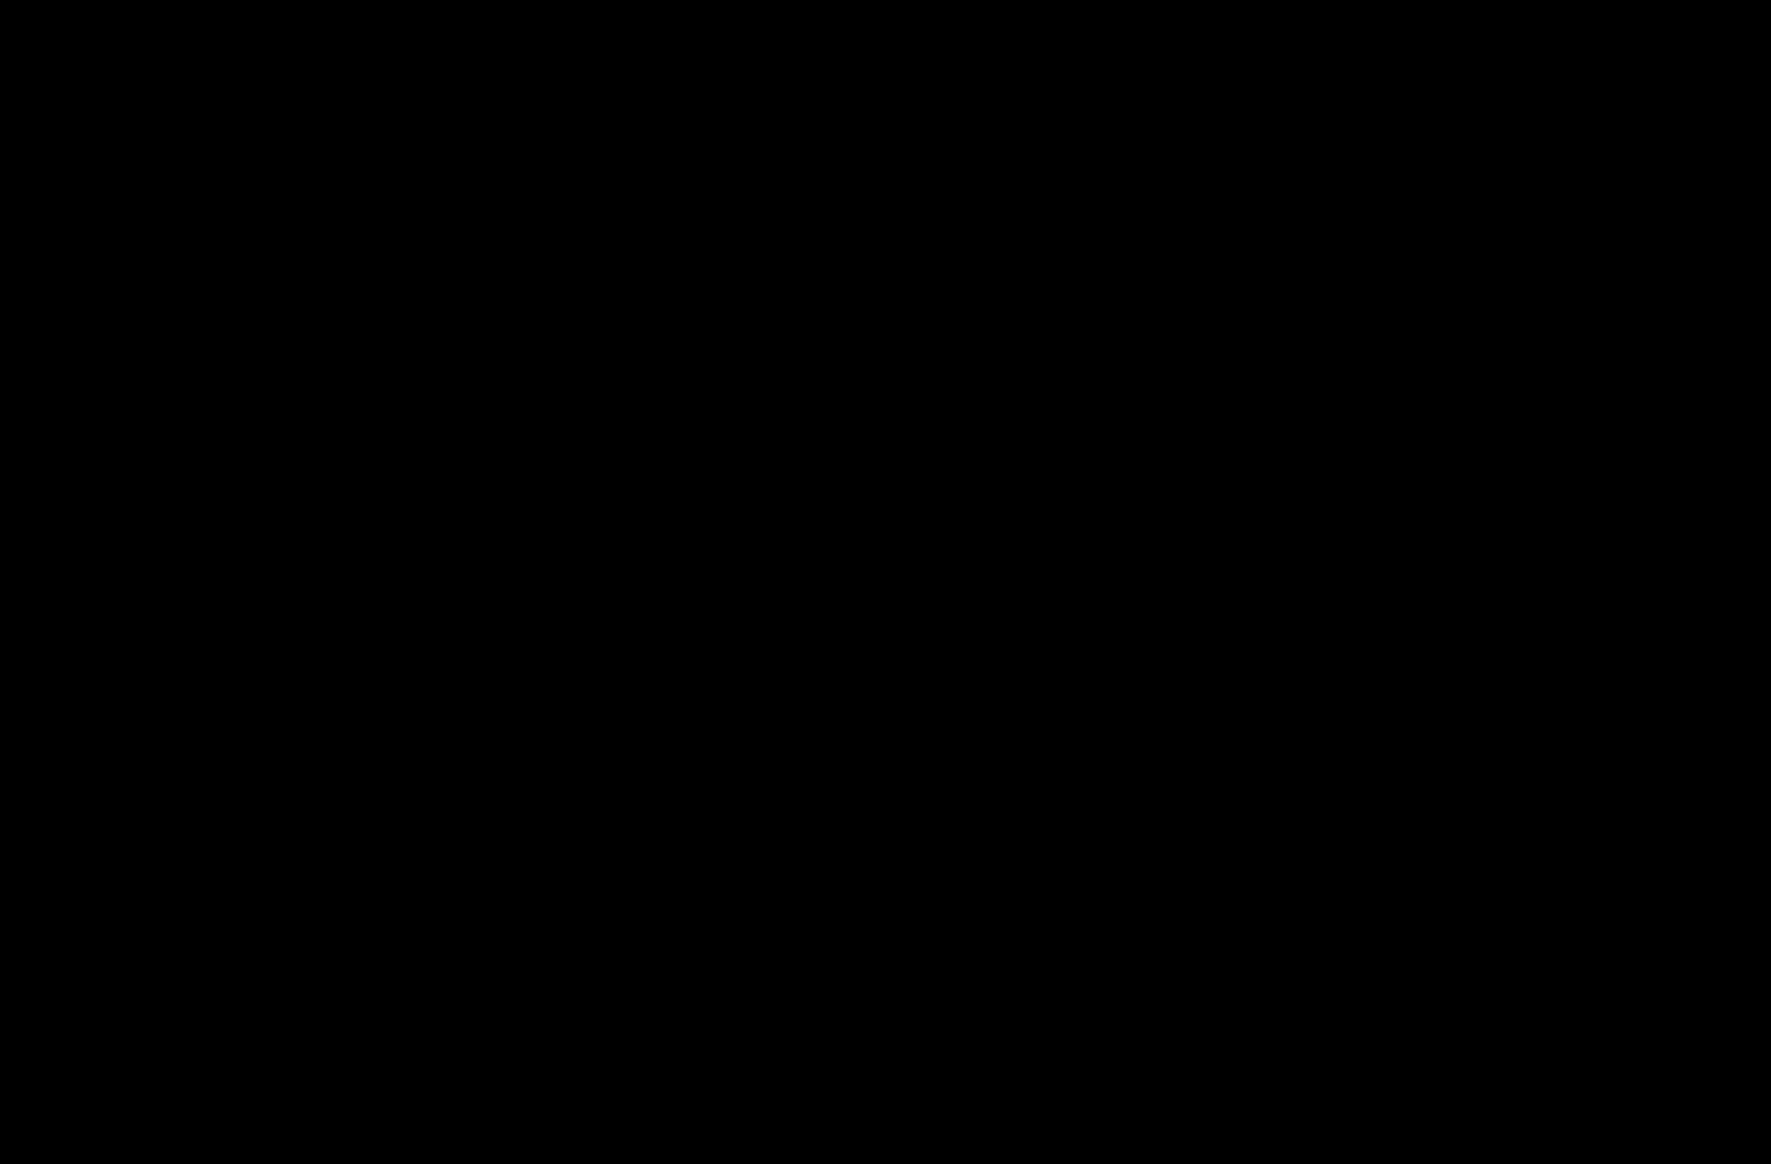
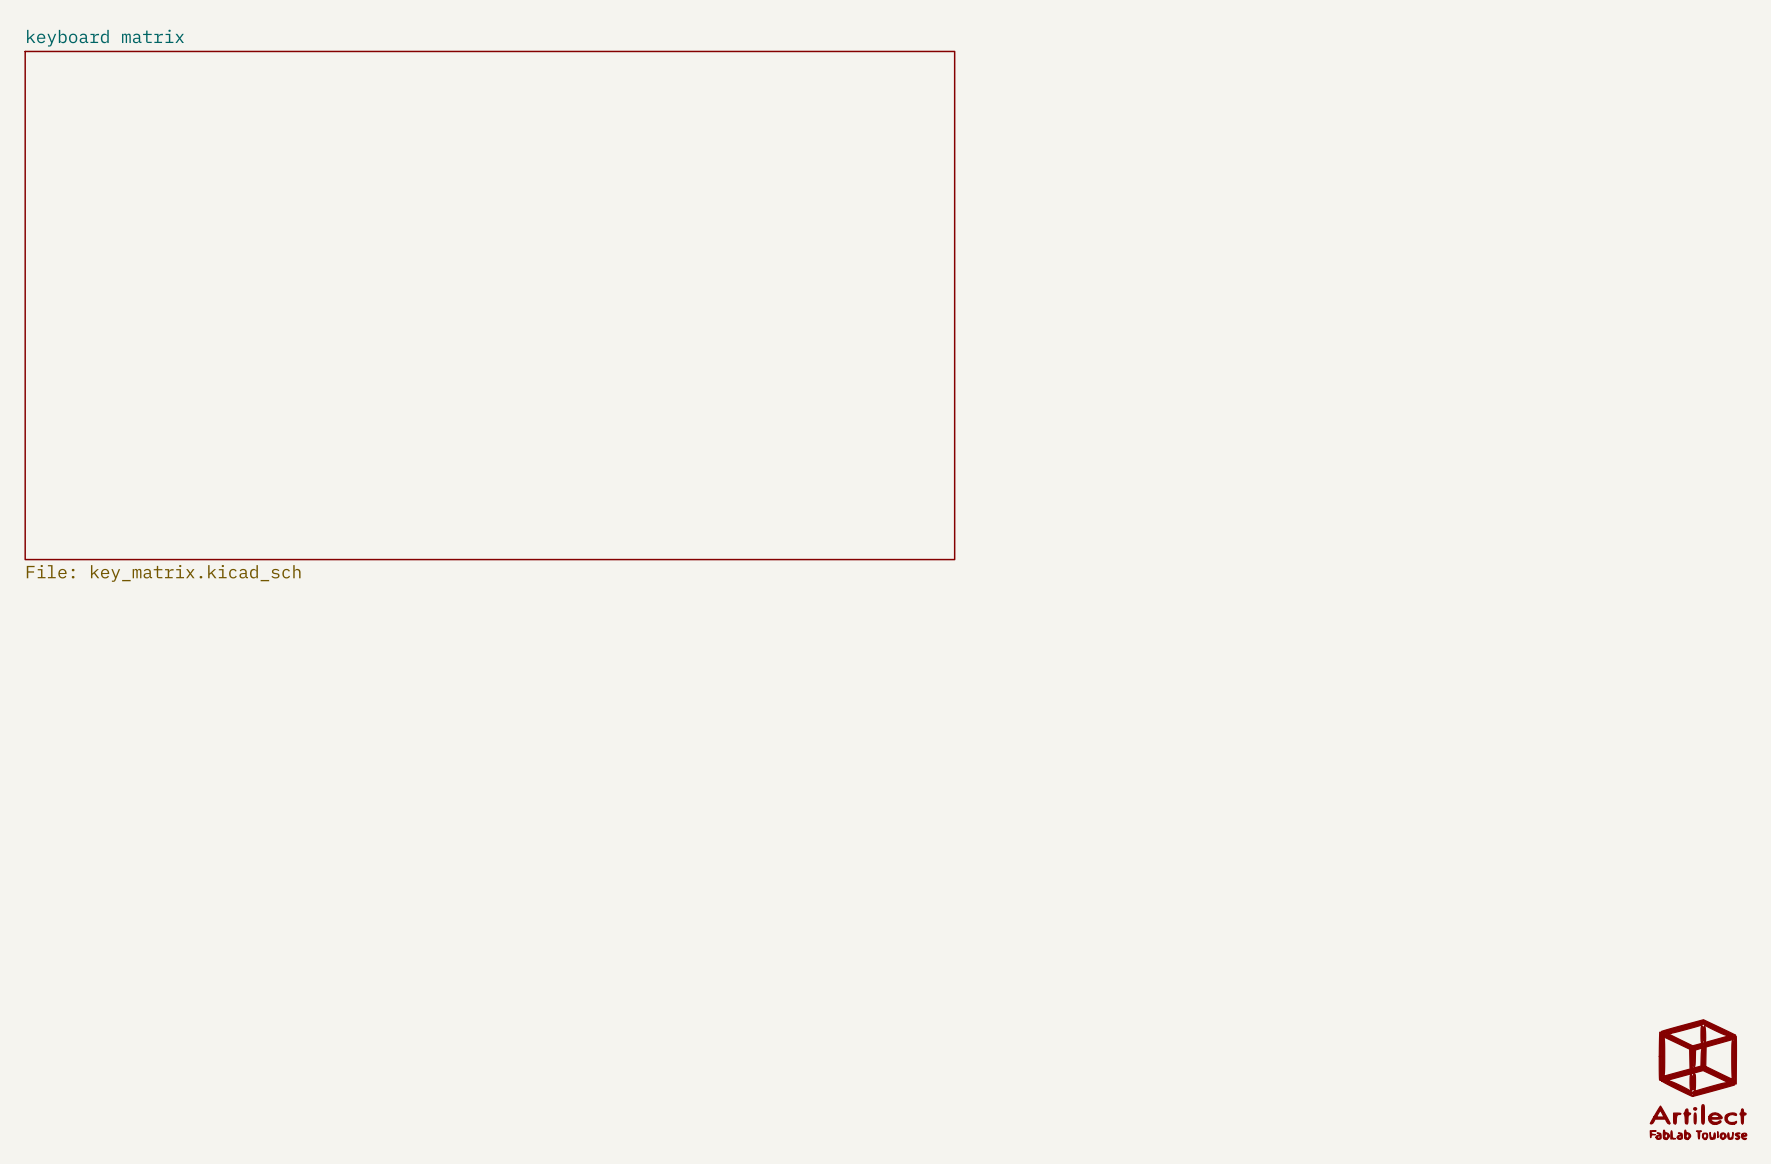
sheet keyboard matrix: none -> File: key_matrix.kicad_sch (489, 305)
power symbol: none -> (1698, 1079)

